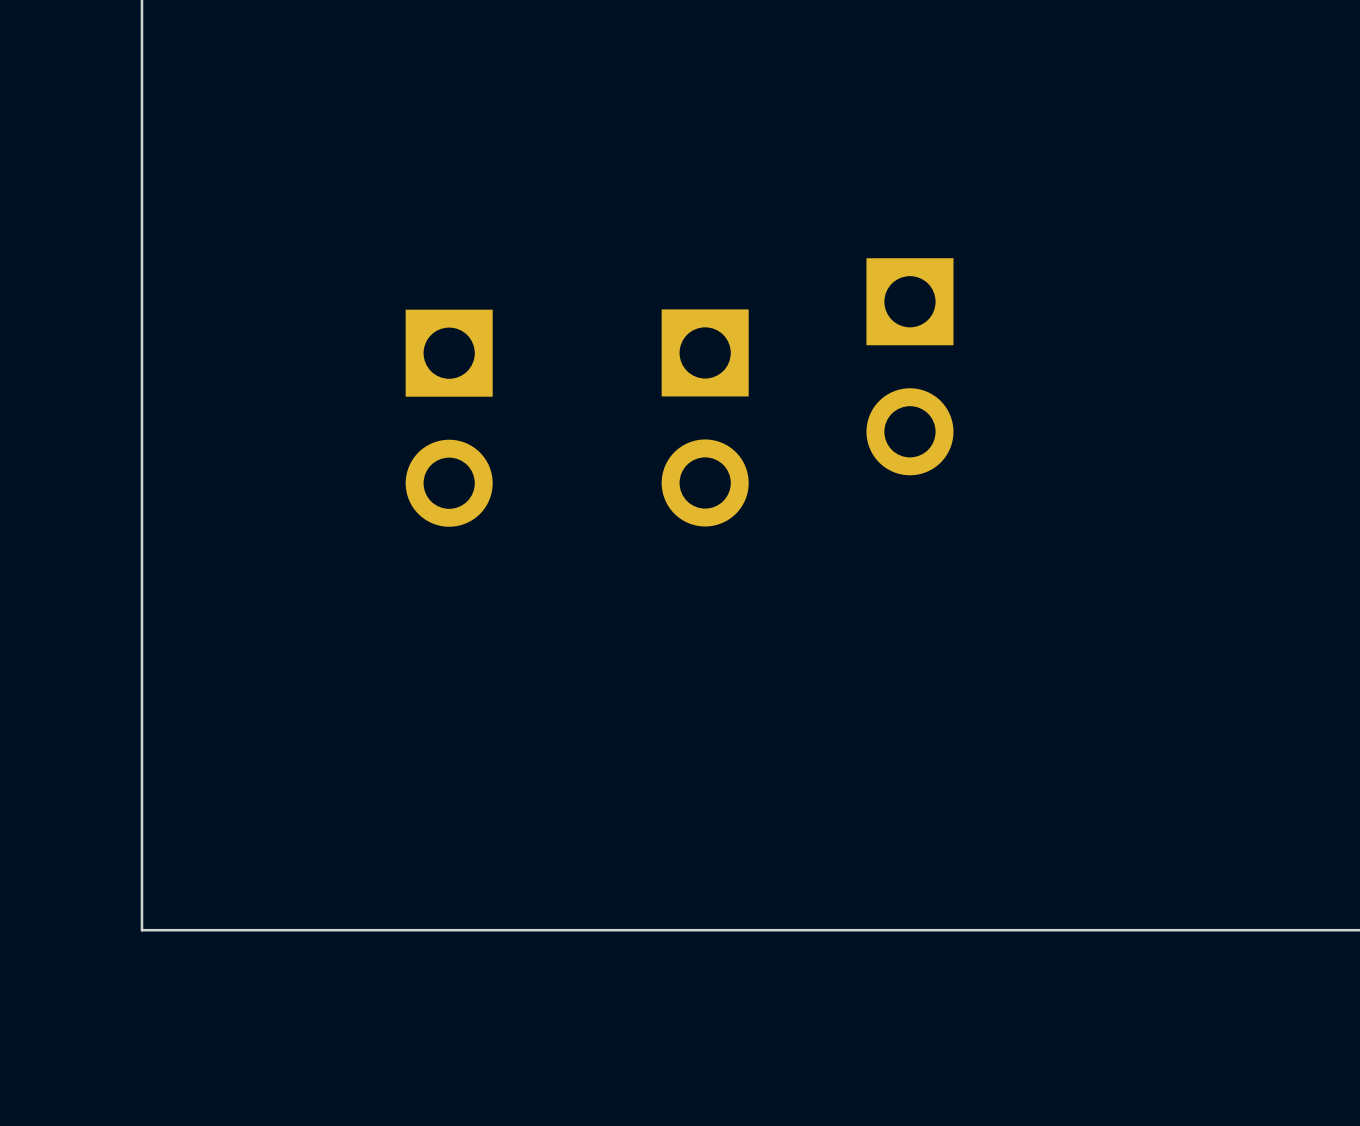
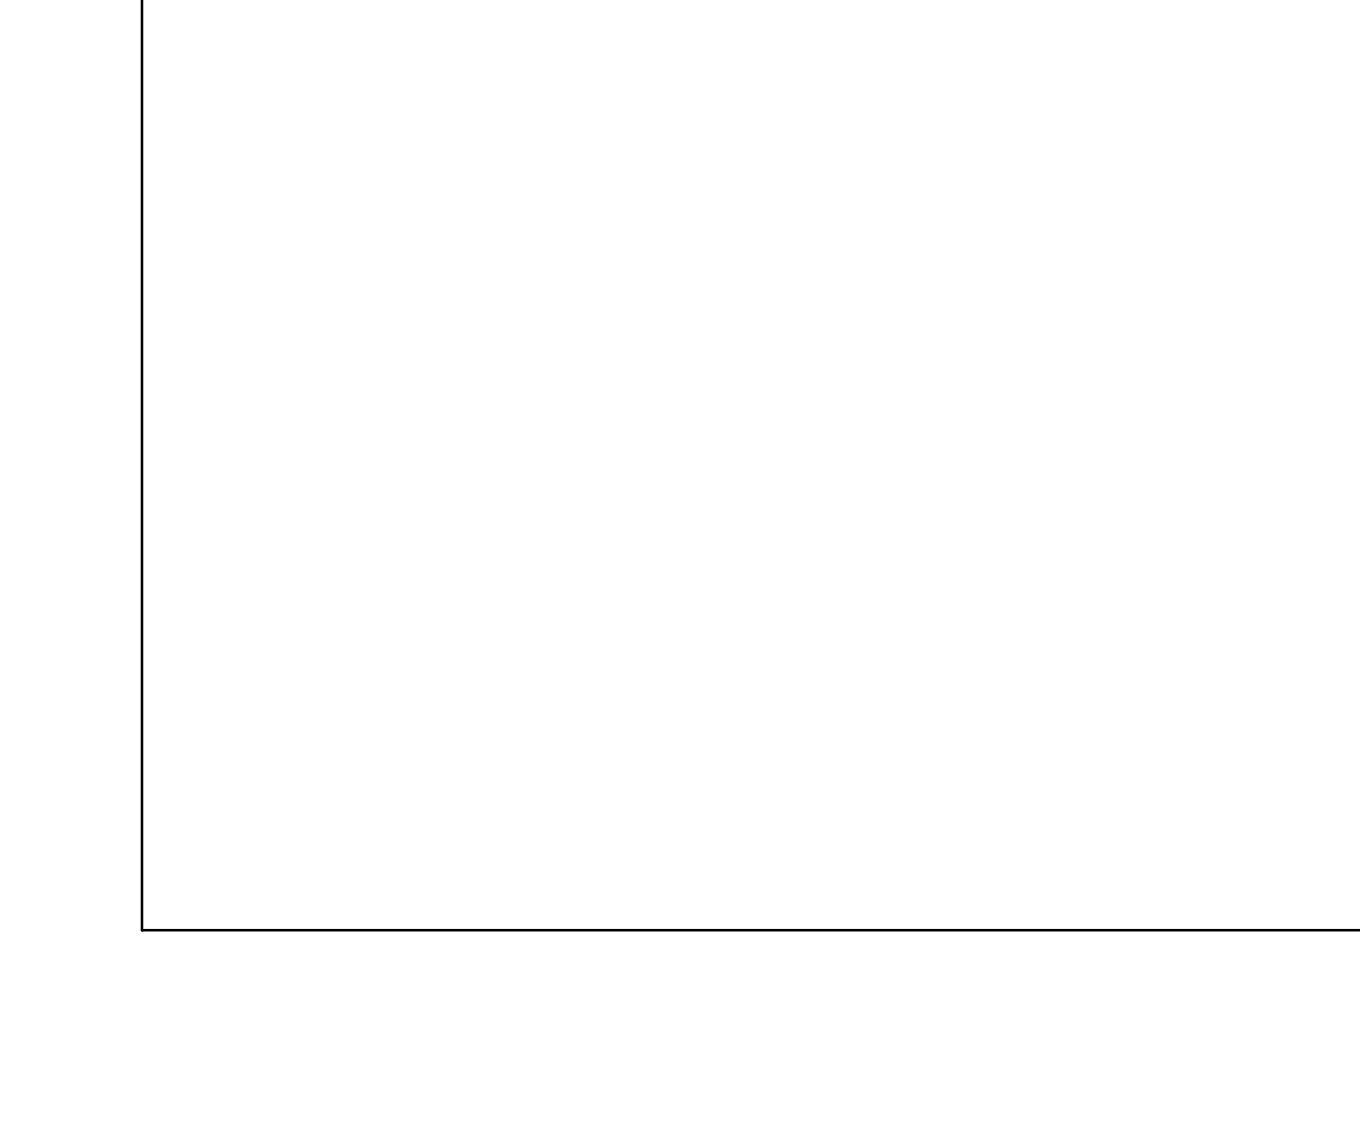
part: (909, 366) -> none
part: (705, 417) -> none
part: (449, 418) -> none

